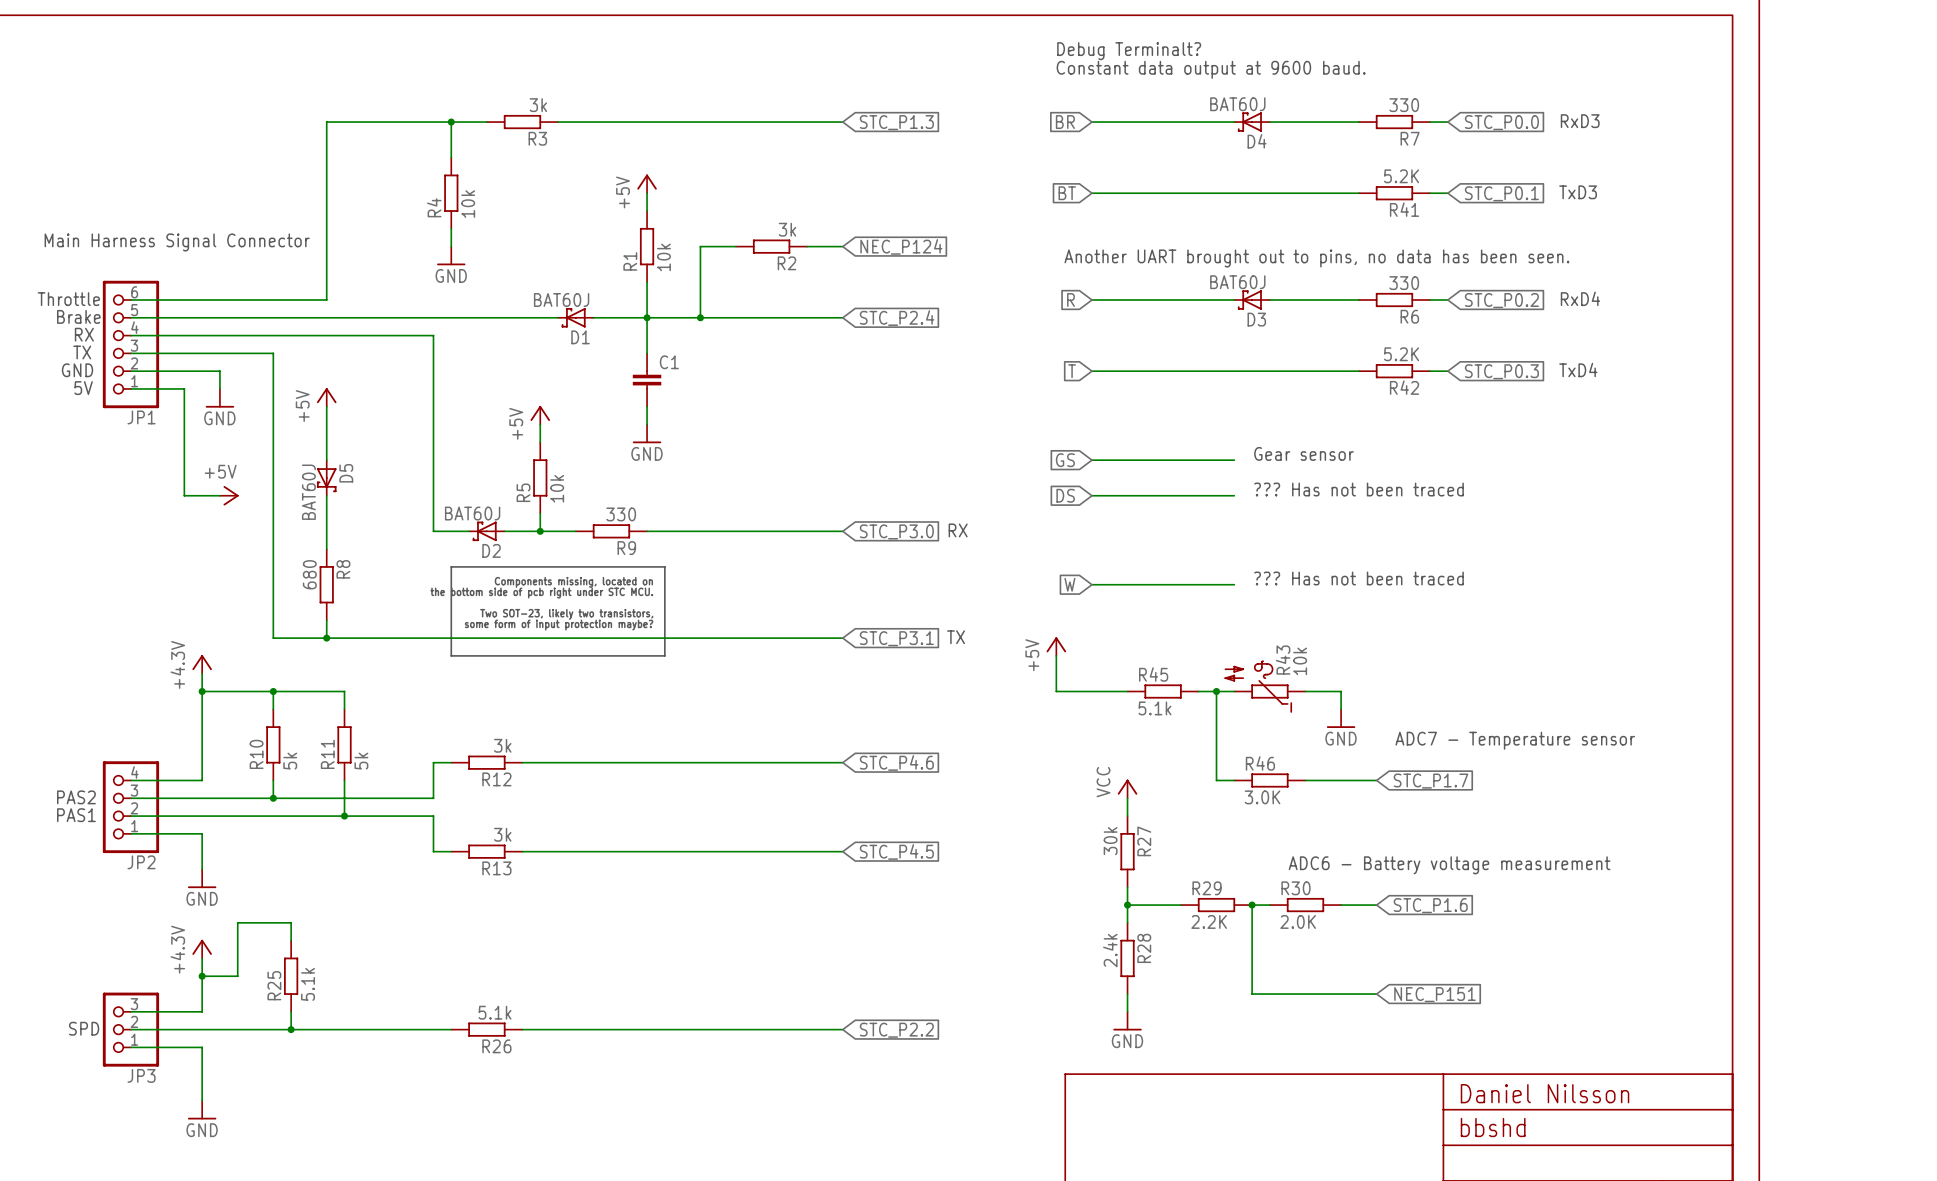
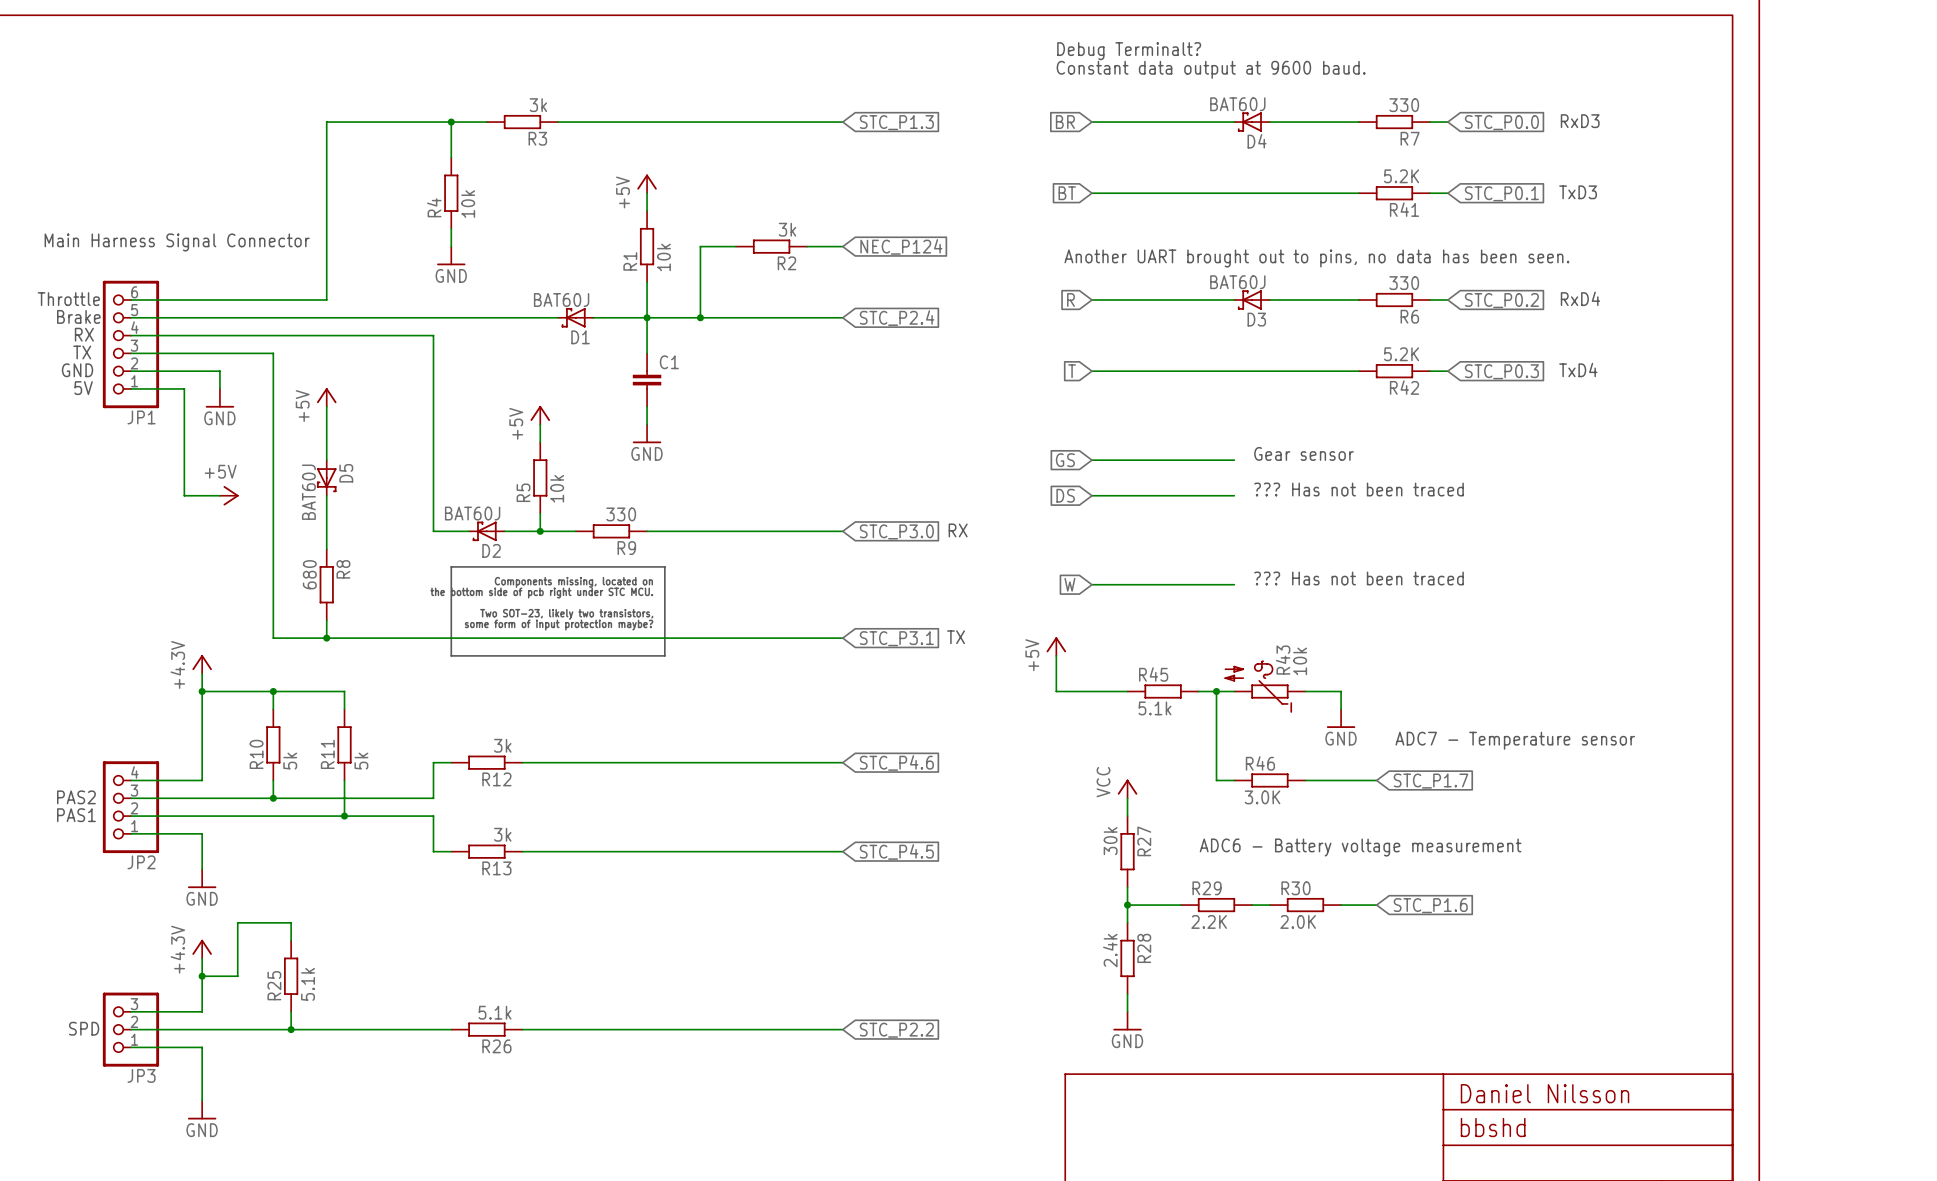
text position: ADC6 - Battery voltage measurement (1449, 865) -> ADC6 - Battery voltage measurement (1360, 847)
wire: (1252, 905) (1252, 994) (1376, 994) -> none
junction: (1252, 905) -> none
global label: NEC_P151 (1434, 994) -> none

